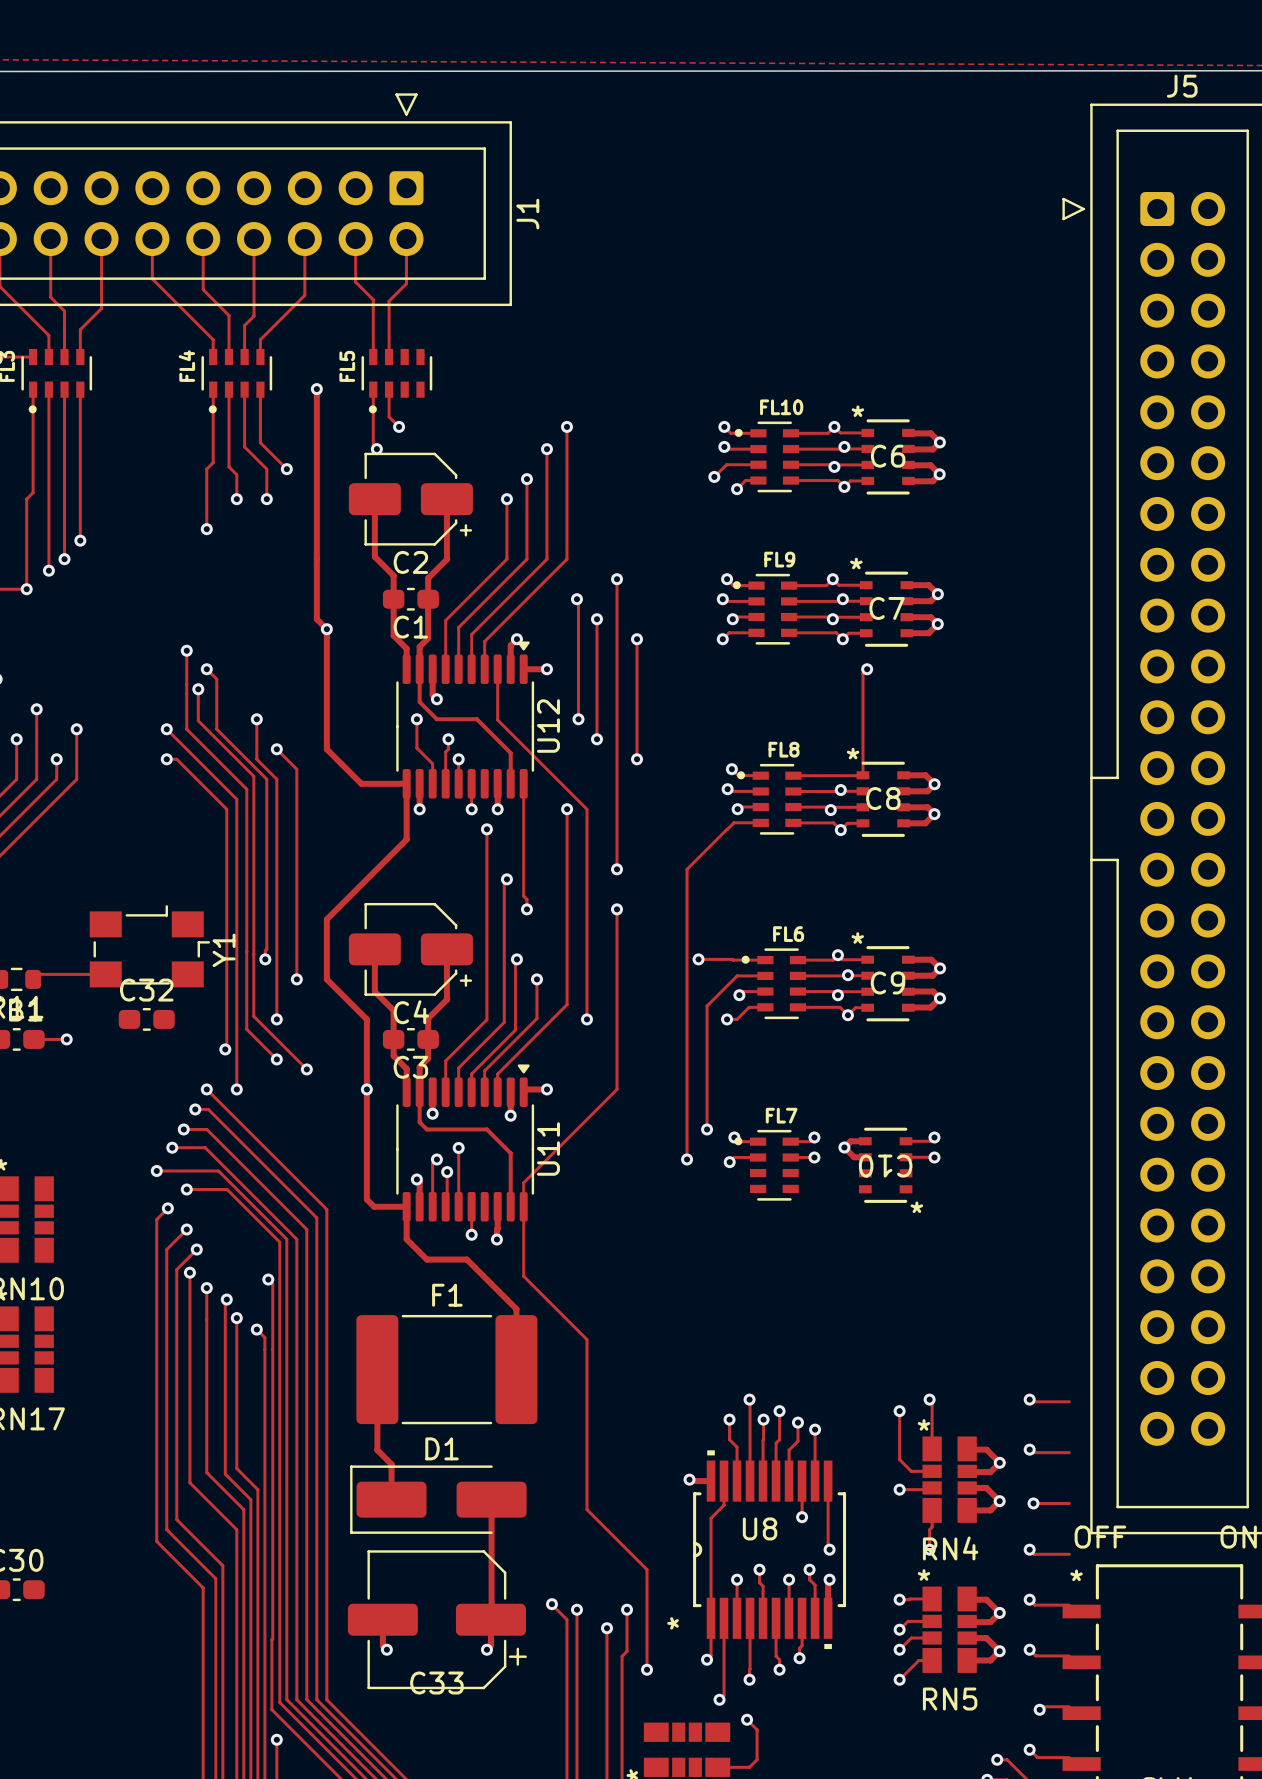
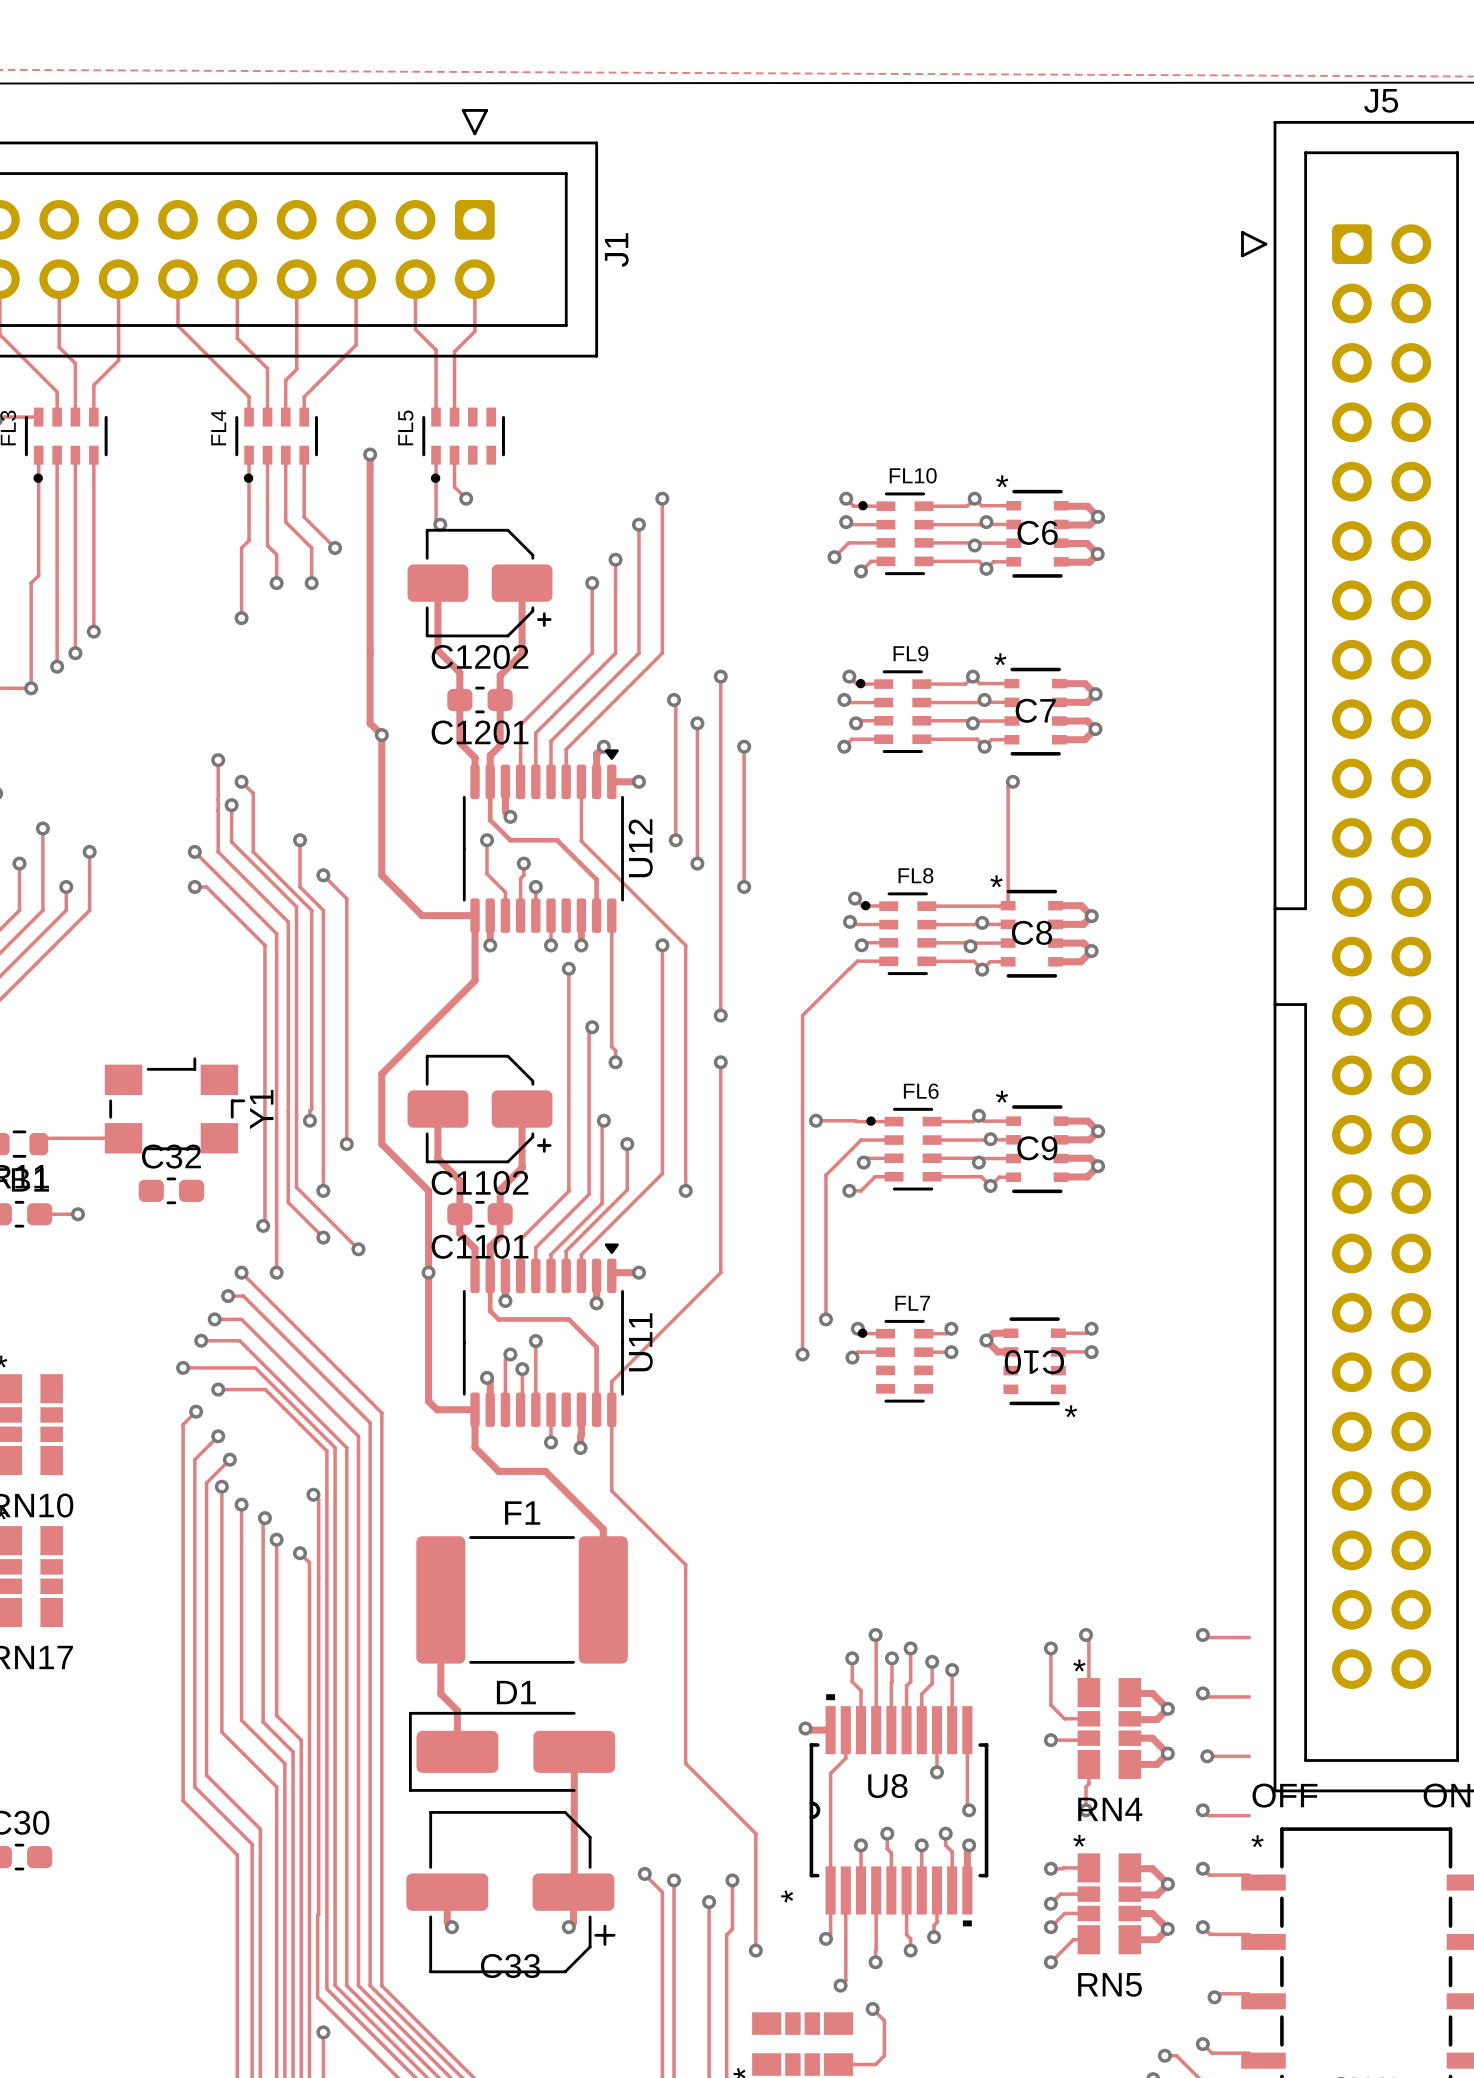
C2 name: C2 (410, 562) -> C1202 (480, 657)
C1 name: C1 (410, 627) -> C1201 (480, 732)
C4 name: C4 (411, 1012) -> C1102 (480, 1182)
C3 name: C3 (410, 1067) -> C1101 (480, 1246)

